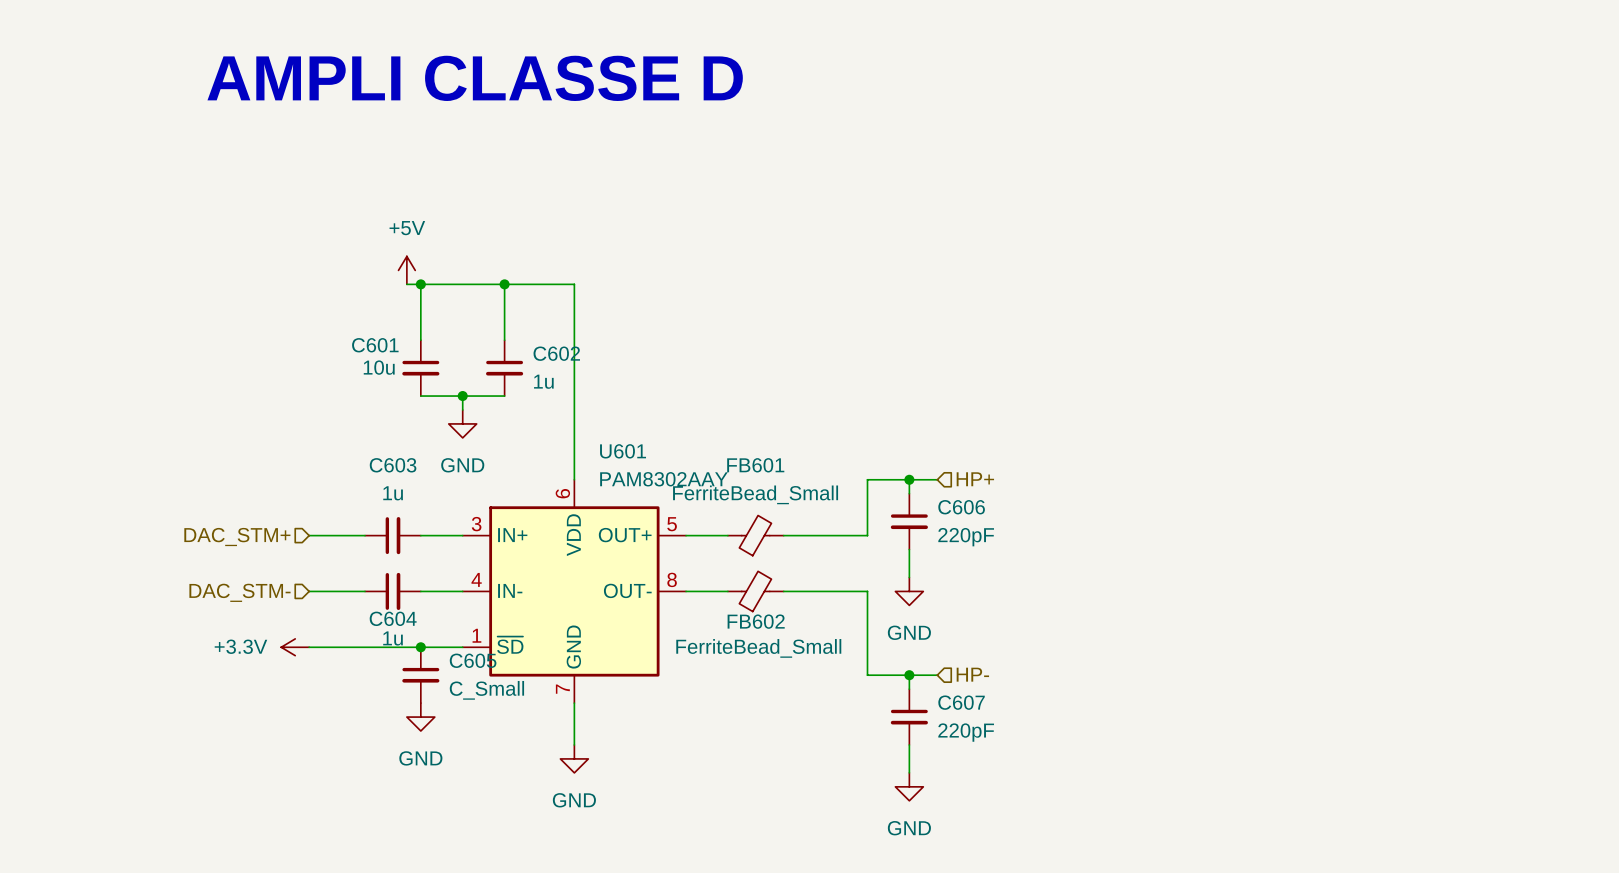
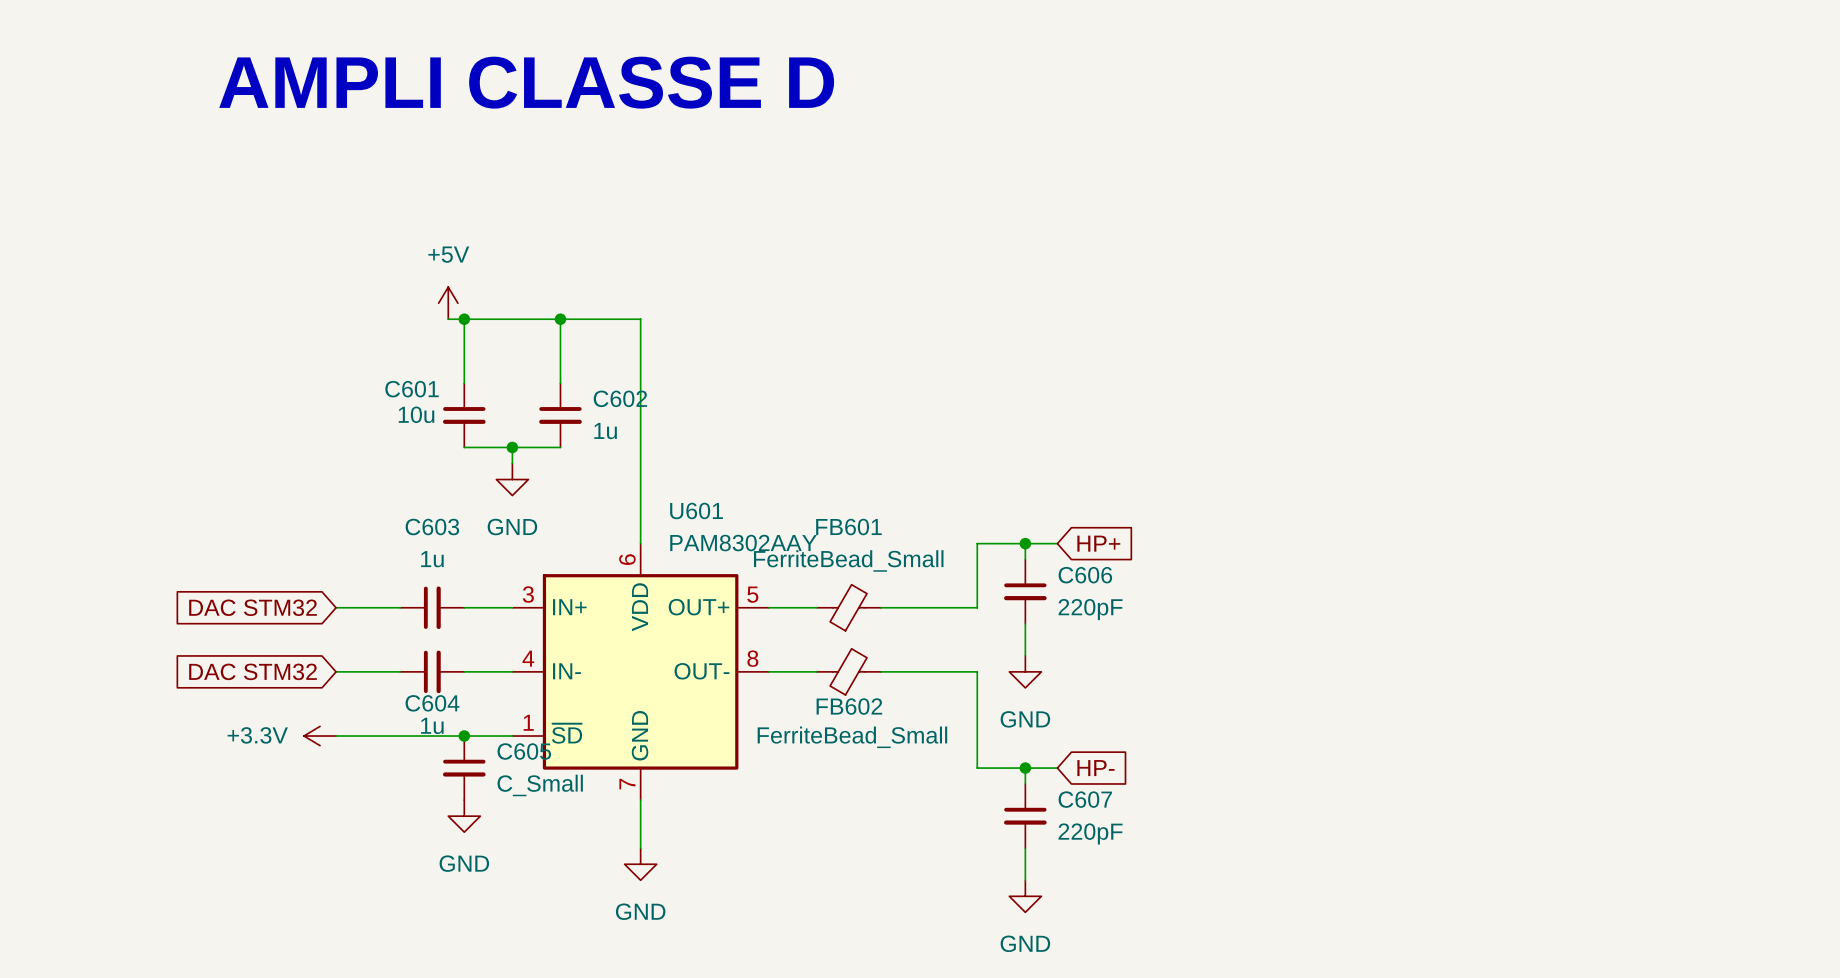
global label: none -> HP+ (1098, 543)
hierarchical label: HP+ (975, 479) -> none
global label: none -> DAC STM32 (253, 607)
hierarchical label: DAC_STM+ (237, 537) -> none
global label: none -> DAC STM32 (253, 671)
hierarchical label: DAC_STM- (239, 592) -> none
hierarchical label: HP- (972, 674) -> none
global label: none -> HP- (1095, 768)

